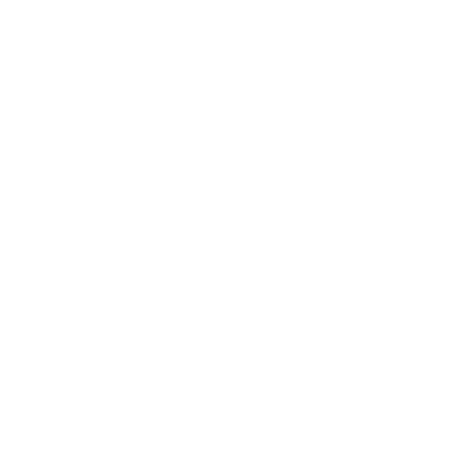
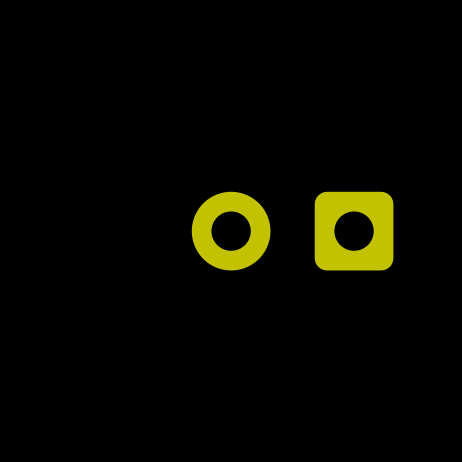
part: none -> (292, 231)

